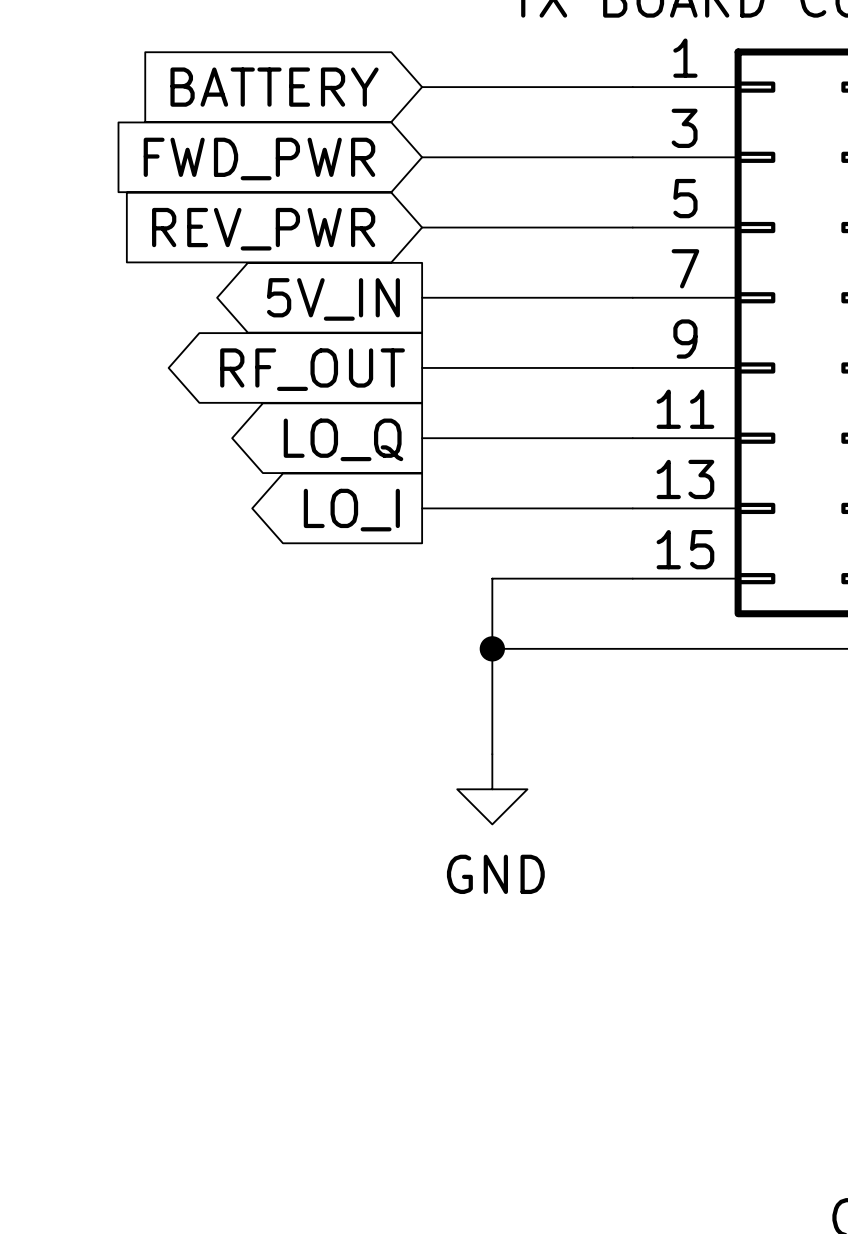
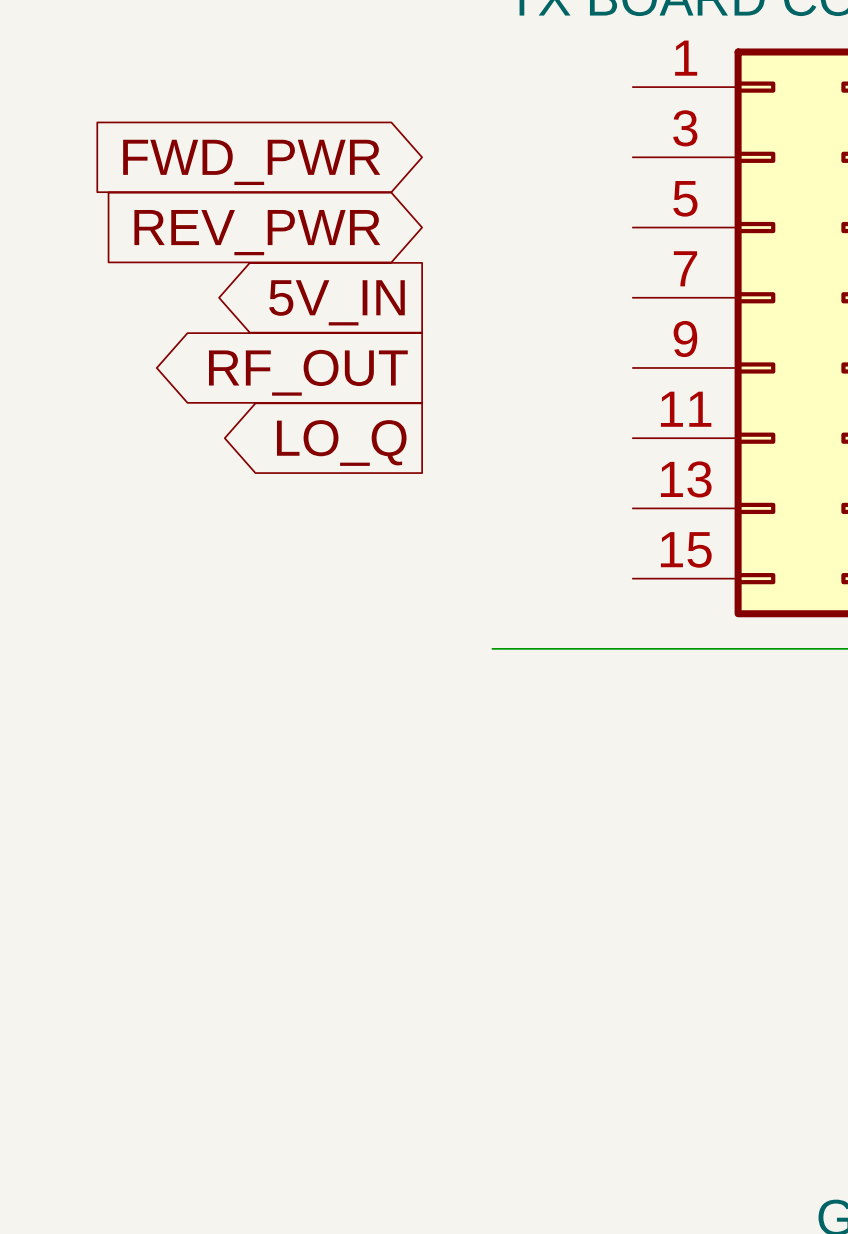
global label: BATTERY (274, 87) -> none
wire: (422, 87) (632, 87) -> none
wire: (422, 157) (632, 157) -> none
wire: (422, 227) (632, 227) -> none
wire: (422, 297) (632, 297) -> none
wire: (422, 367) (632, 367) -> none
wire: (422, 438) (632, 438) -> none
wire: (422, 508) (632, 508) -> none
global label: LO_I (351, 510) -> none
wire: (632, 578) (492, 578) (492, 754) -> none
junction: (492, 648) -> none
power symbol: GND (492, 789) -> none

